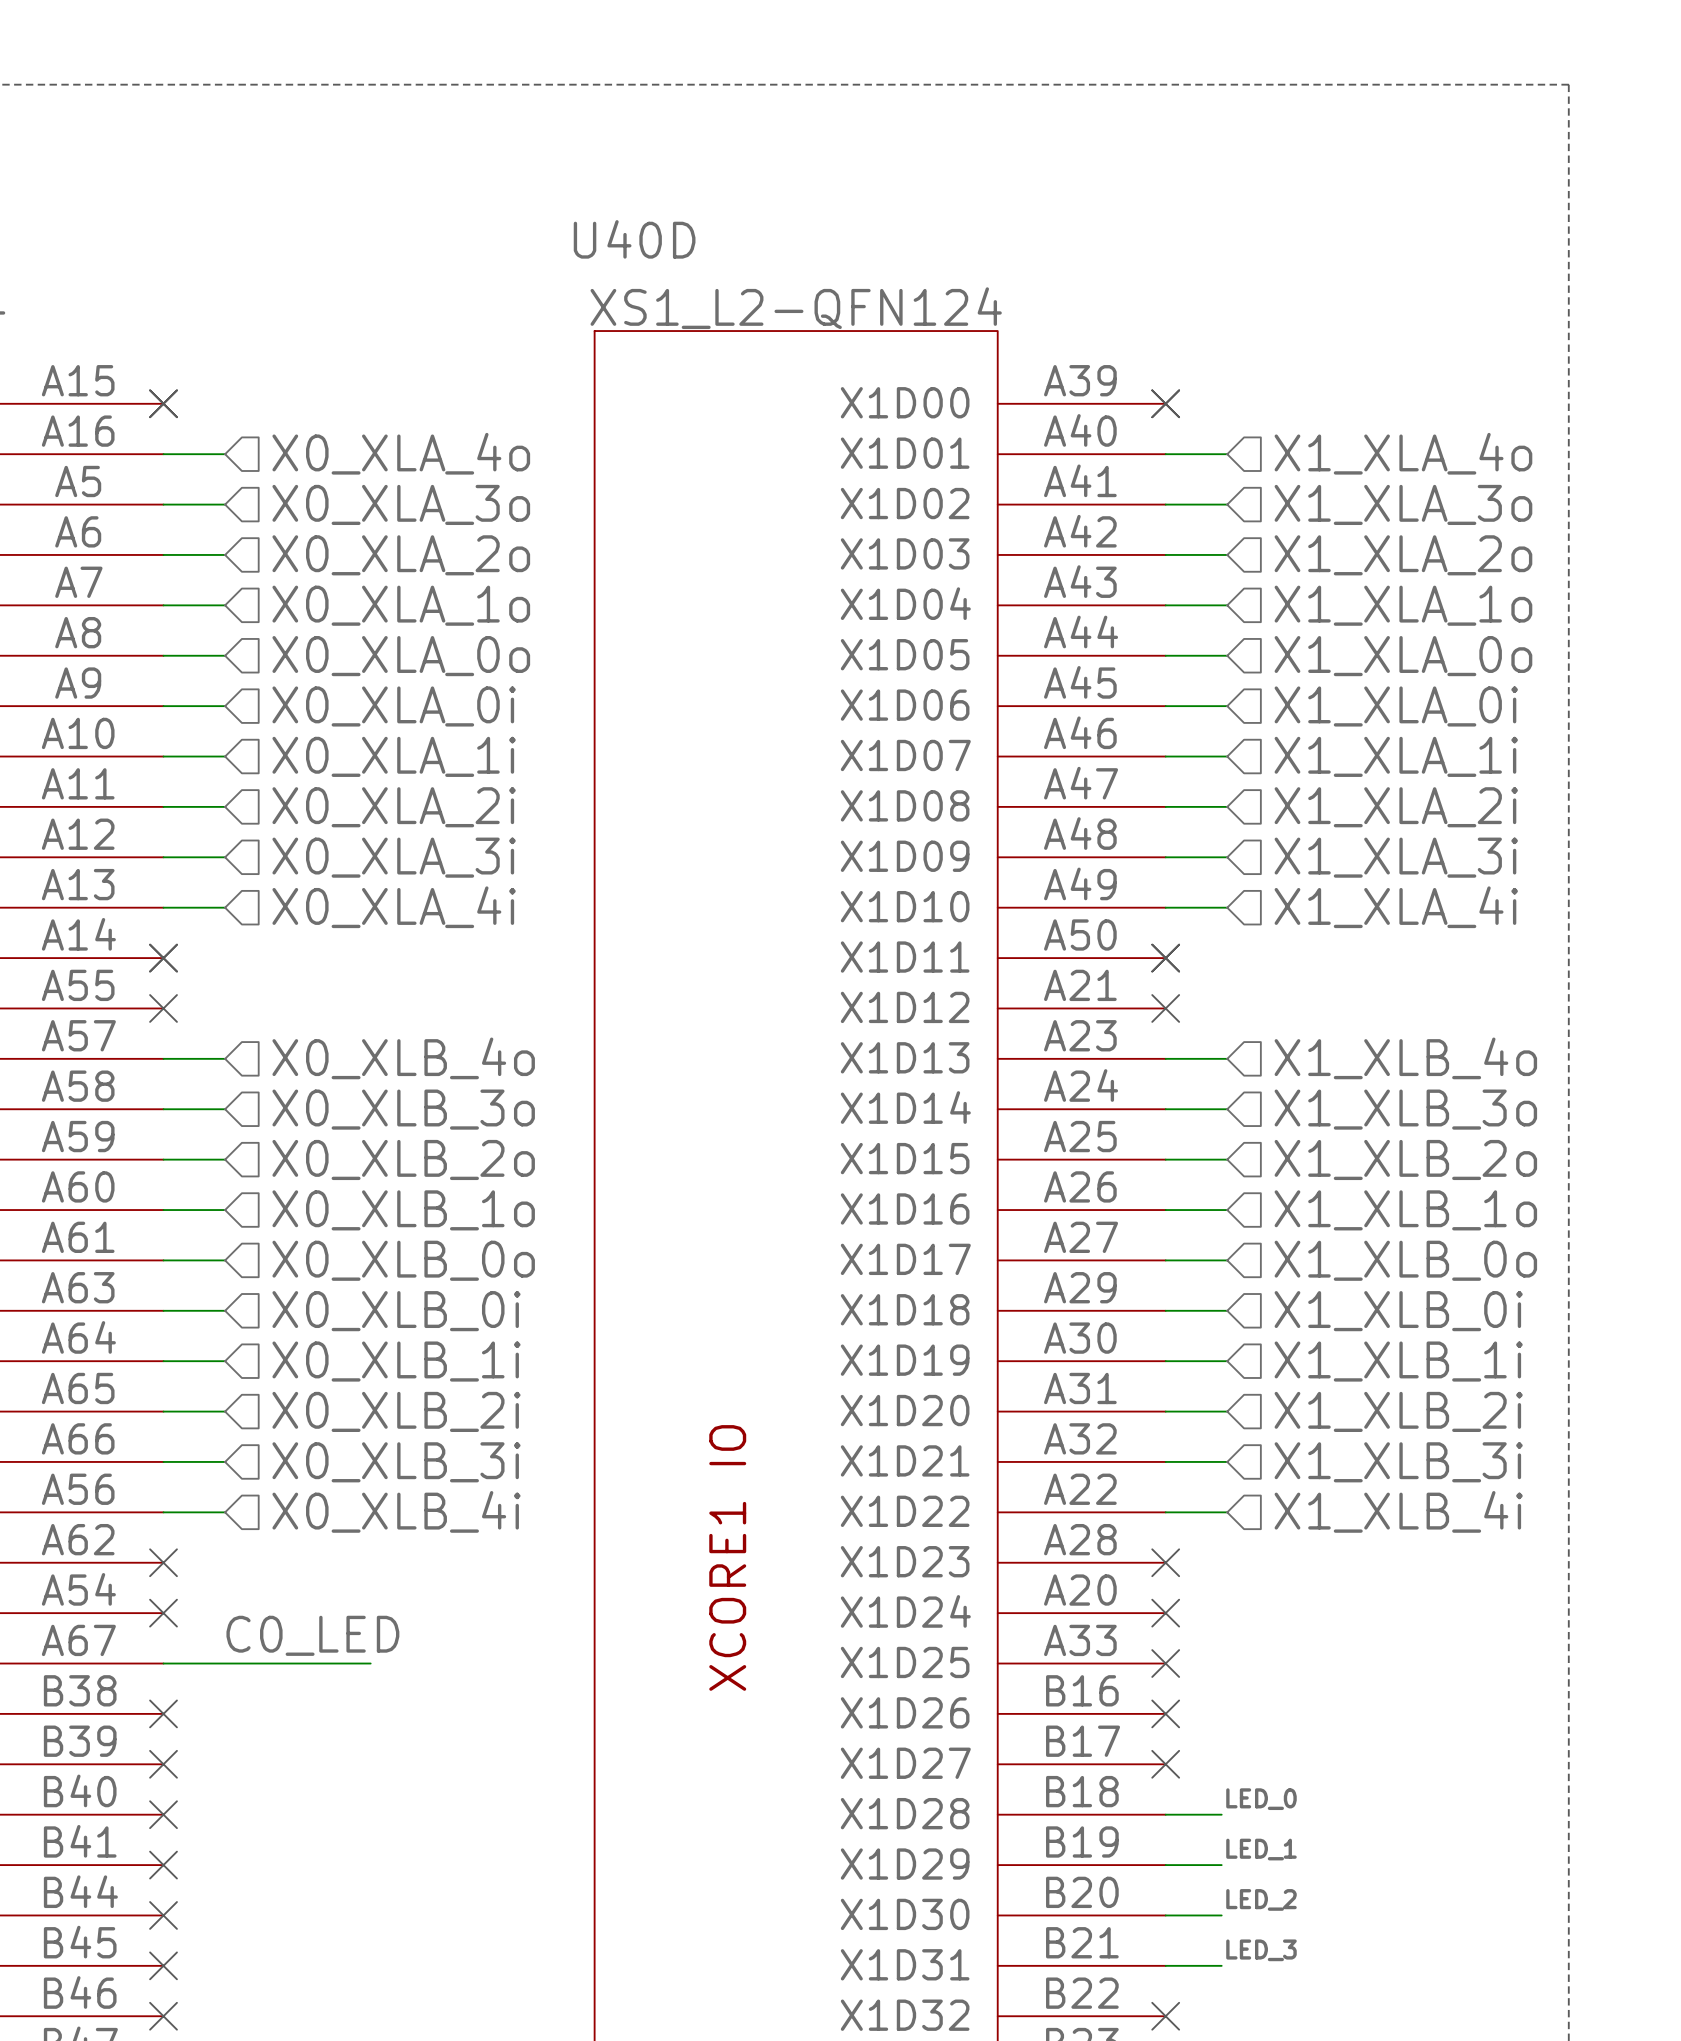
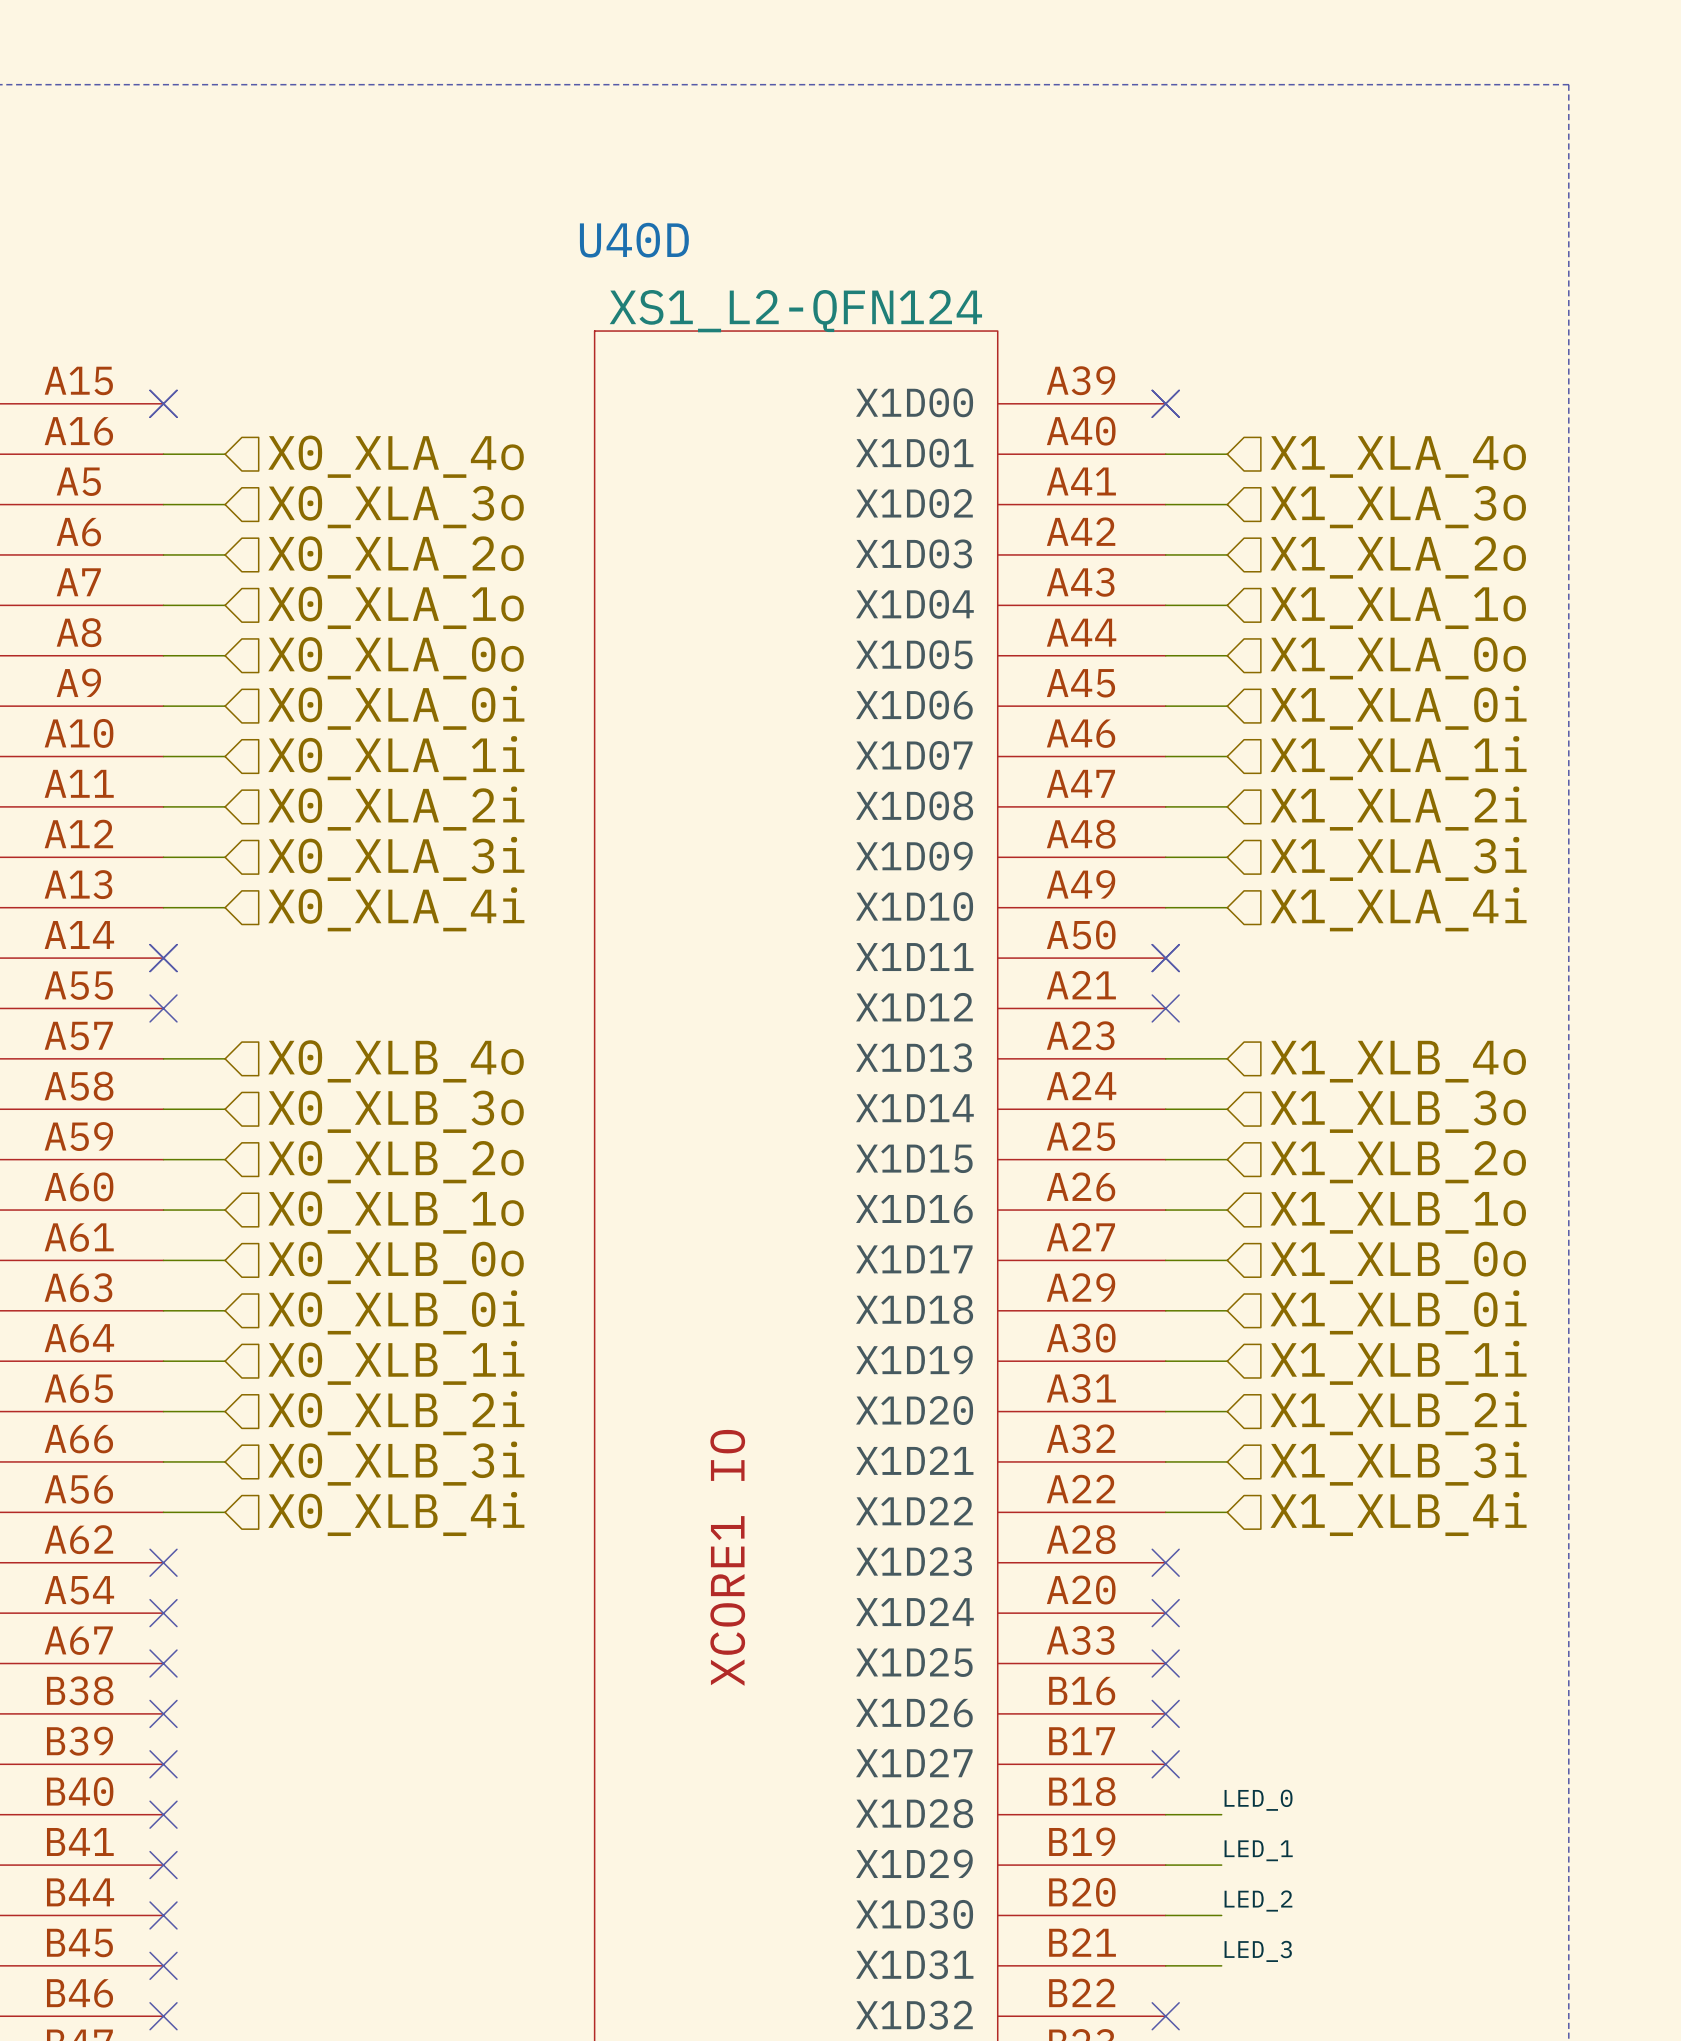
label: C0_LED (312, 1635) -> none
wire: (163, 1663) (370, 1663) -> none
no-connect mark: none -> (163, 1663)

